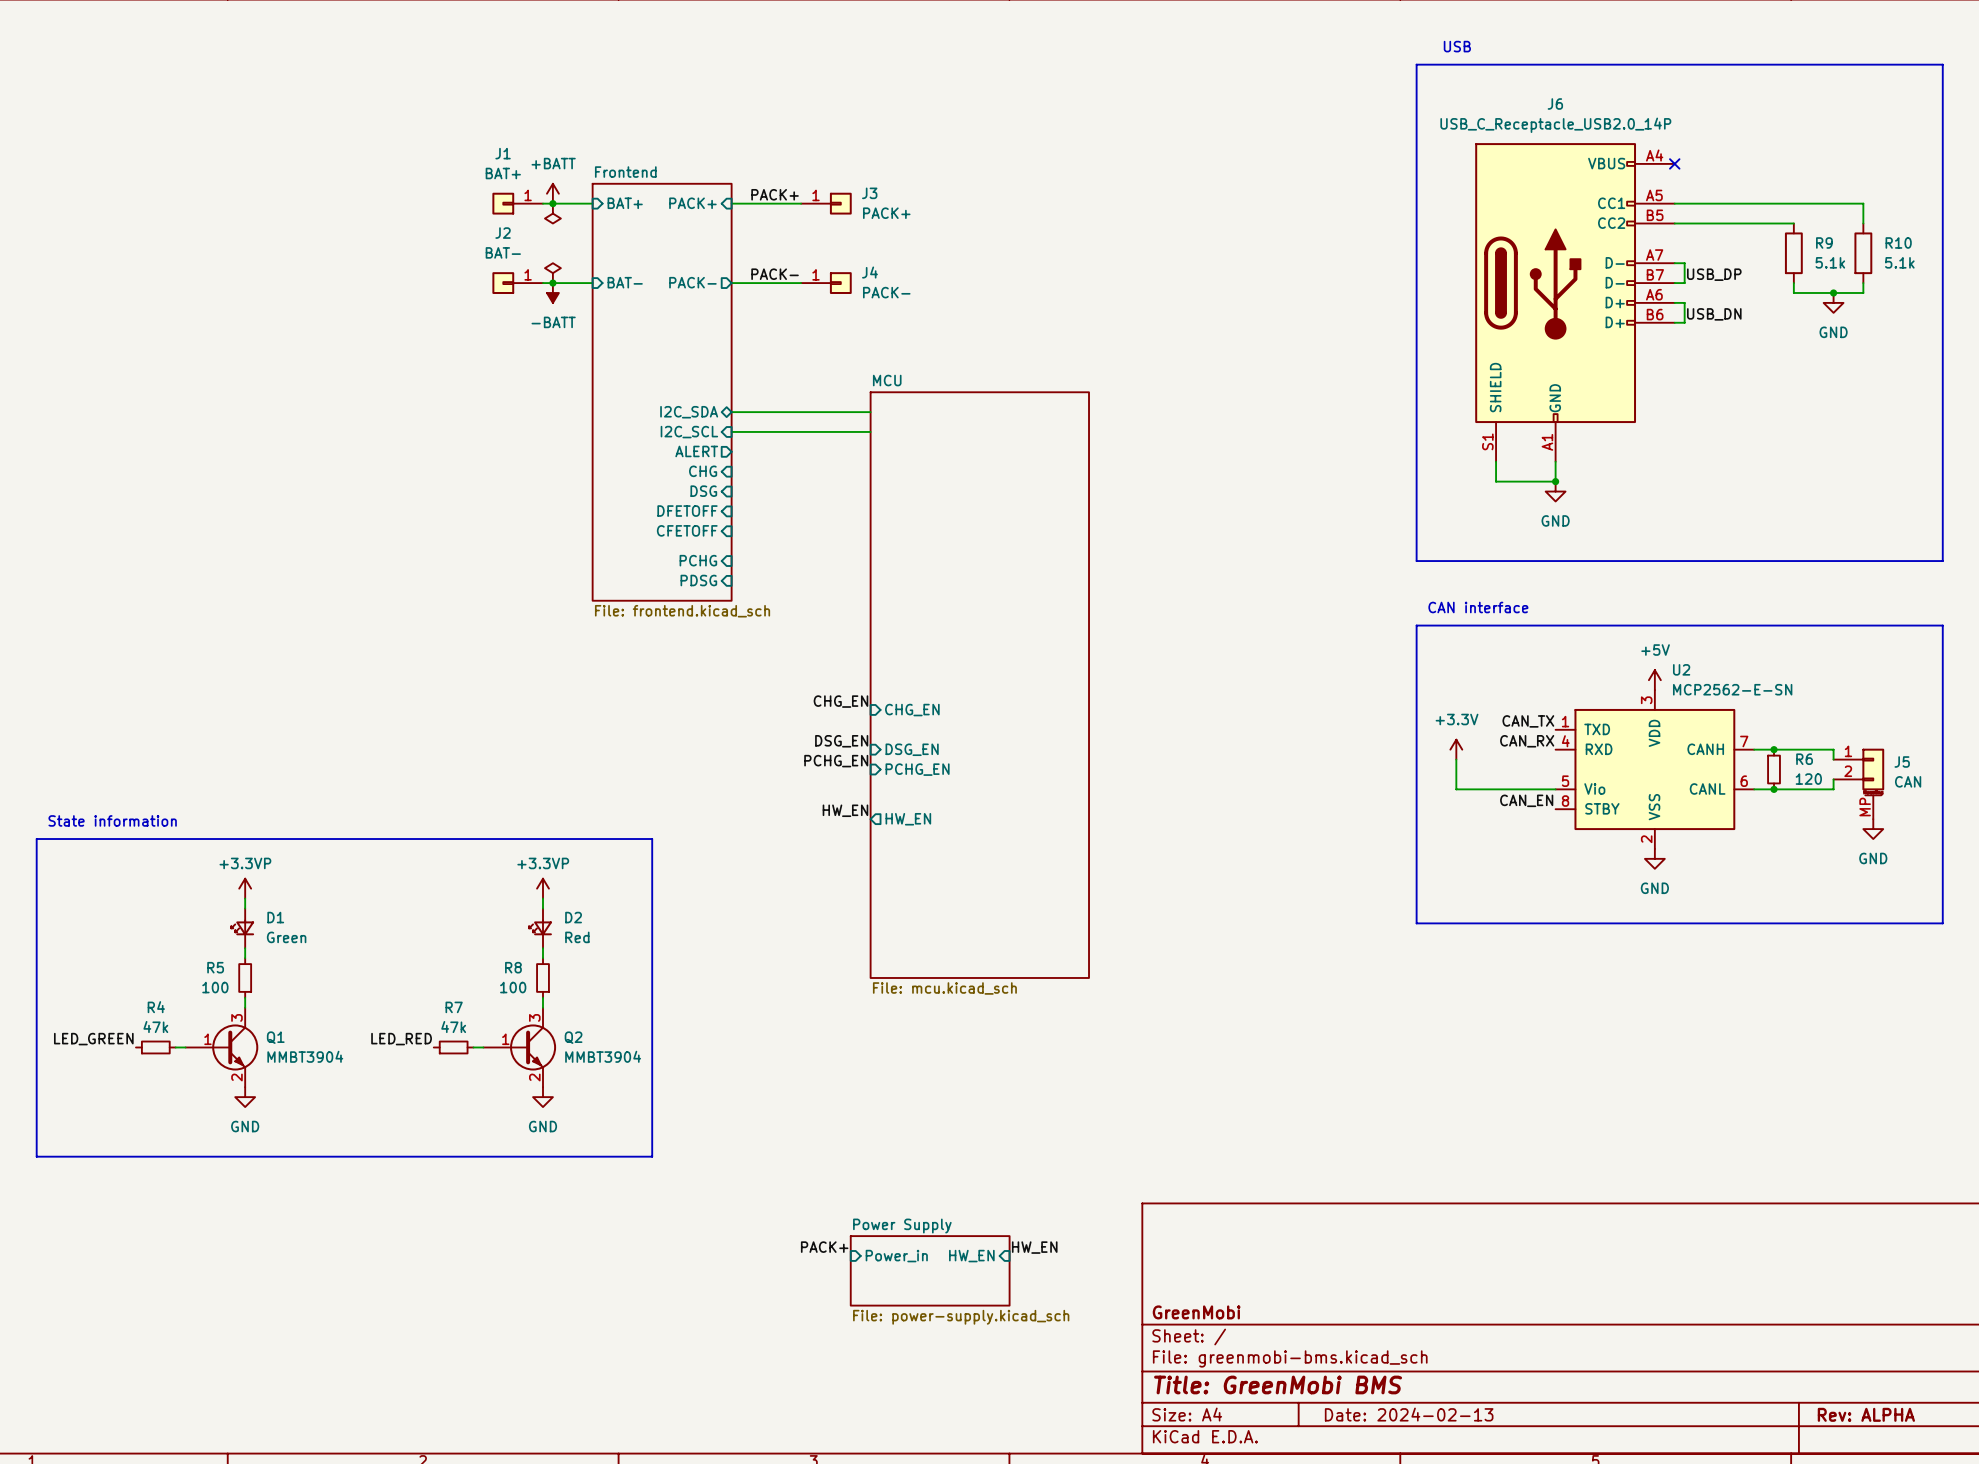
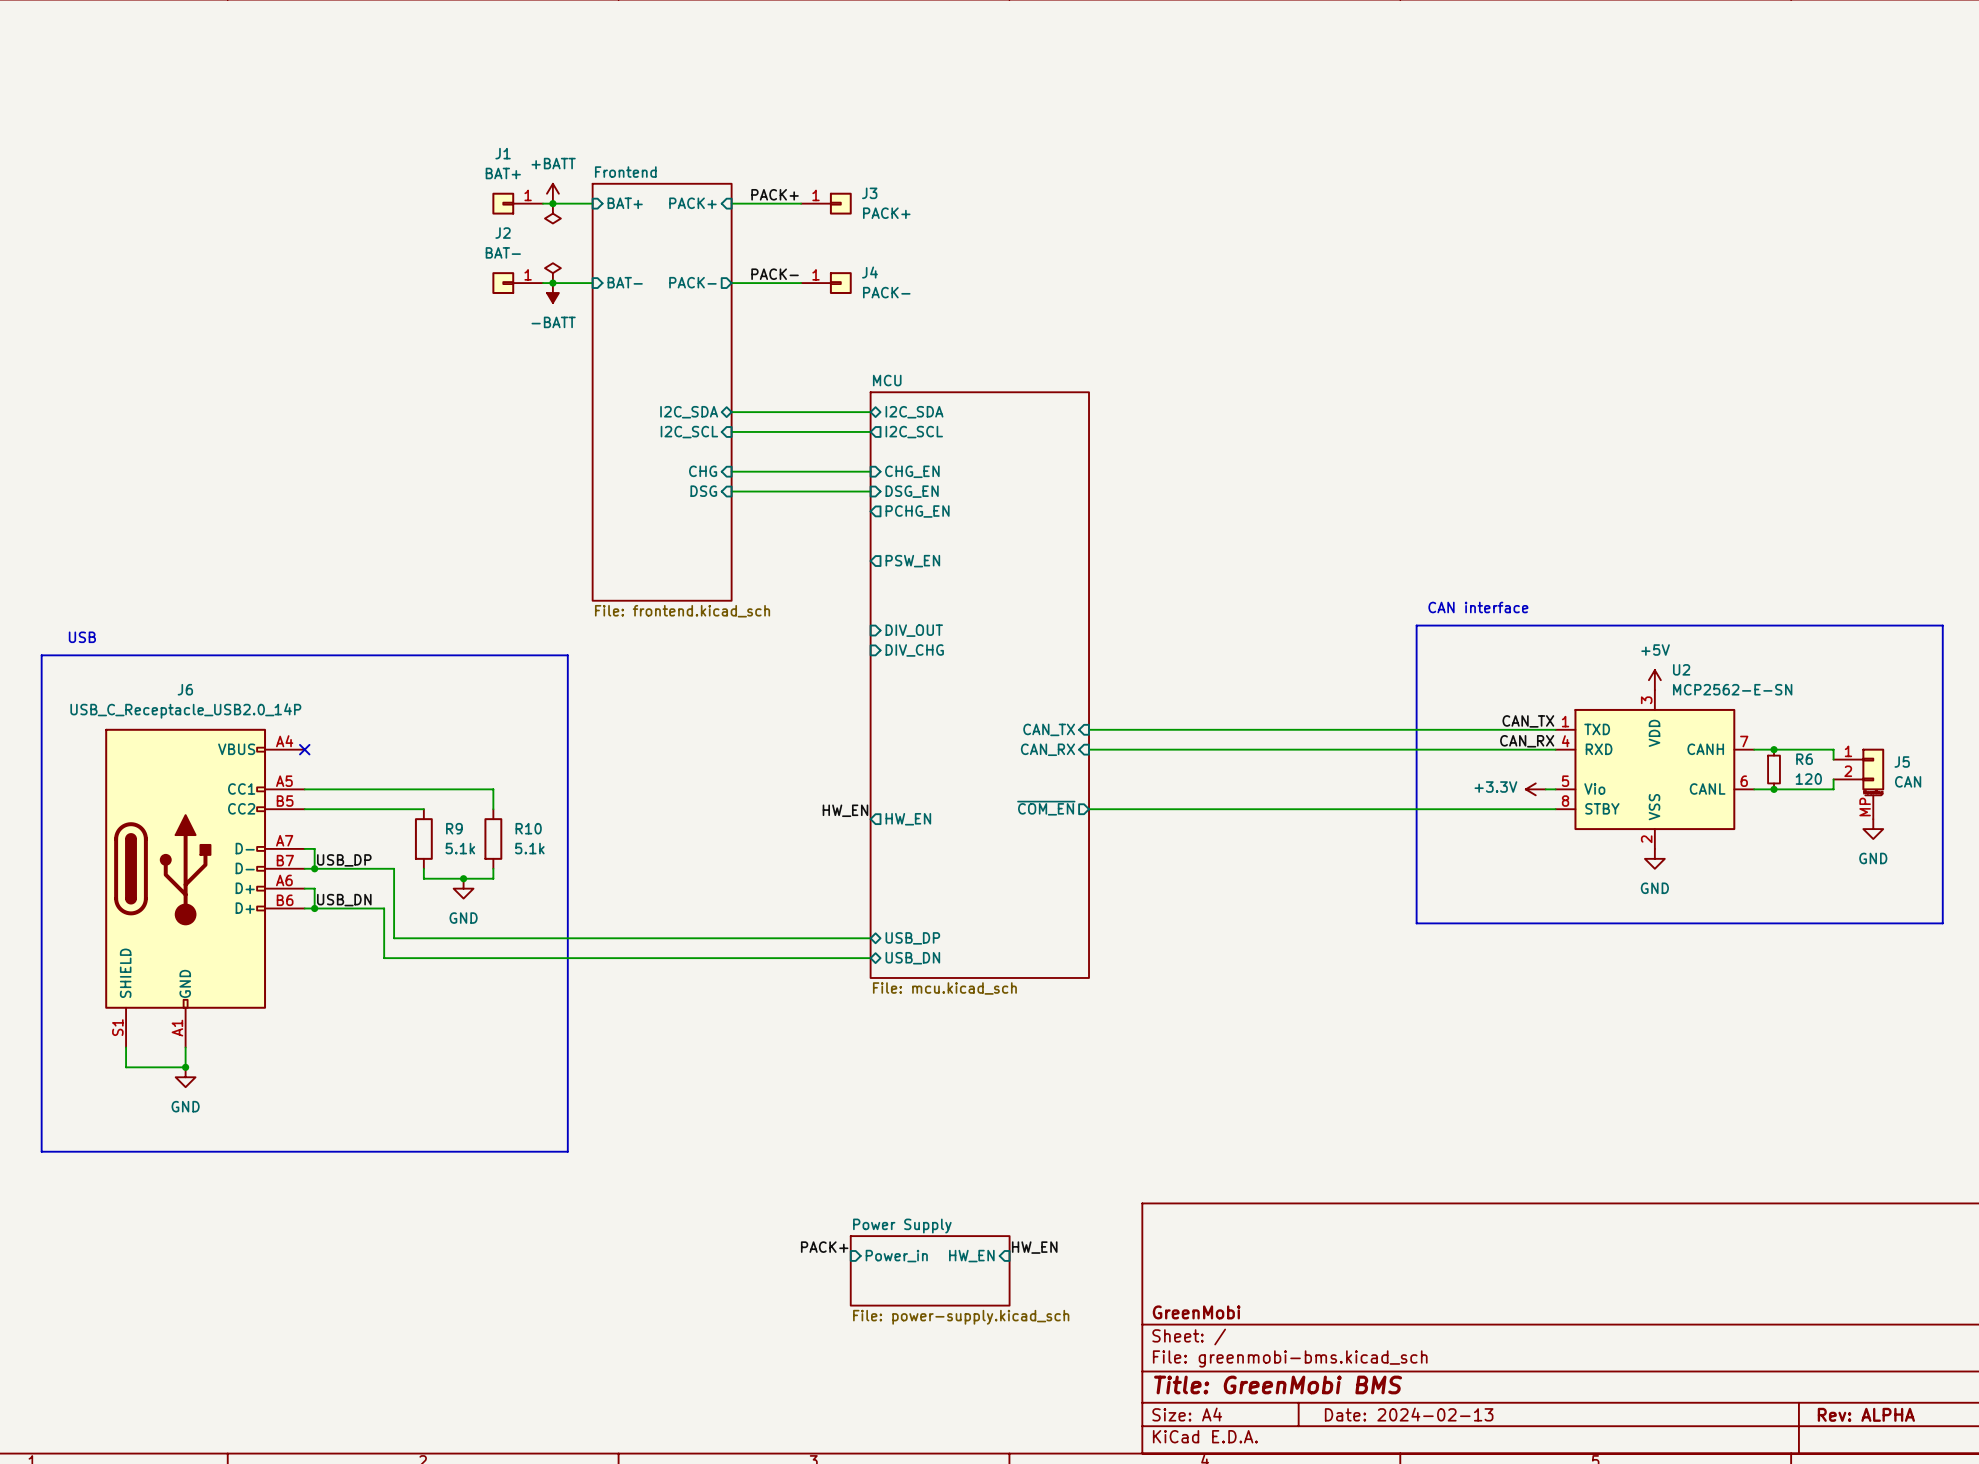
text: USB (1457, 46) -> none
line: (1416, 64) (1416, 561) (1942, 561) (1942, 64) (1416, 64) -> none
no-connect mark: (1674, 163) -> none
wire: (1674, 203) (1863, 203) (1863, 223) -> none
wire: (1674, 223) (1793, 223) -> none
R9 position: (1793, 253) -> (423, 839)
R10 position: (1863, 253) -> (493, 839)
wire: (1674, 263) (1684, 263) (1684, 283) (1674, 283) -> none
label: USB_DP (1714, 274) -> none
wire: (1793, 283) (1793, 292) (1863, 292) (1863, 283) -> none
junction: (1833, 292) -> none
J6 position: (1574, 302) -> (204, 888)
wire: (1674, 302) (1684, 302) (1684, 322) (1674, 322) -> none
power symbol: GND (1833, 302) -> none
label: USB_DN (1714, 314) -> none
sheet pin: none -> I2C_SDA (914, 412)
sheet pin: none -> I2C_SCL (914, 432)
sheet pin: ALERT (696, 451) -> none
wire: (1496, 461) (1496, 481) (1555, 481) (1555, 461) -> none
wire: none -> (731, 471) (870, 471)
sheet pin: none -> CHG_EN (912, 471)
junction: (1555, 481) -> none
wire: none -> (731, 491) (870, 491)
sheet pin: none -> DSG_EN (912, 491)
power symbol: GND (1555, 491) -> none
sheet pin: DFETOFF (687, 511) -> none
sheet pin: none -> PCHG_EN (917, 511)
sheet pin: CFETOFF (687, 530) -> none
sheet pin: PCHG (698, 560) -> none
sheet pin: none -> PSW_EN (912, 561)
sheet pin: PDSG (698, 580) -> none
sheet pin: none -> DIV_OUT (914, 630)
text: none -> USB (82, 637)
sheet pin: none -> DIV_CHG (914, 650)
label: CHG_EN (840, 701) -> none
sheet pin: CHG_EN (912, 710) -> none
sheet pin: none -> CAN_TX (1049, 729)
wire: none -> (1089, 729) (1555, 729)
label: DSG_EN (841, 741) -> none
no-connect mark: none -> (304, 749)
sheet pin: DSG_EN (912, 749) -> none
sheet pin: none -> CAN_RX (1047, 749)
wire: none -> (1089, 749) (1555, 749)
power symbol rotation: 0° (1456, 749) -> 90° counterclockwise (1535, 789)
power symbol position: +3.3V (1456, 749) -> +3.3V (1535, 789)
wire: (1456, 759) (1456, 789) (1545, 789) -> none
label: PCHG_EN (836, 761) -> none
sheet pin: PCHG_EN (917, 769) -> none
wire: none -> (304, 789) (493, 789) (493, 809)
label: CAN_EN (1526, 800) -> none
sheet pin: none -> ~{COM_EN} (1046, 808)
wire: none -> (304, 809) (423, 809)
wire: none -> (1089, 809) (1555, 809)
text: State information (112, 820) -> none
line: (36, 839) (36, 1156) (652, 1156) (652, 839) (36, 839) -> (41, 655) (41, 1151) (567, 1151) (567, 655) (41, 655)
wire: none -> (304, 848) (314, 848) (314, 868)
label: none -> USB_DP (344, 860)
wire: none -> (304, 868) (394, 868) (394, 938) (870, 938)
junction: none -> (314, 868)
wire: none -> (423, 868) (423, 878) (493, 878) (493, 868)
junction: none -> (463, 878)
power symbol: +3.3VP (245, 888) -> none
wire: none -> (304, 888) (314, 888) (314, 908)
power symbol: none -> GND (463, 888)
power symbol: +3.3VP (543, 888) -> none
wire: (543, 898) (543, 908) -> none
label: none -> USB_DN (344, 900)
wire: none -> (304, 908) (384, 908) (384, 958) (870, 958)
junction: none -> (314, 908)
D1: Green (242, 928) -> none
D2: Red (540, 928) -> none
sheet pin: none -> USB_DP (912, 938)
wire: (543, 948) (543, 958) -> none
sheet pin: none -> USB_DN (912, 958)
R5: 100 (245, 977) -> none
R8: 100 (543, 977) -> none
wire: (543, 997) (543, 1007) -> none
label: LED_GREEN (93, 1039) -> none
label: LED_RED (401, 1039) -> none
R4: 47k (155, 1047) -> none
wire: (175, 1047) (185, 1047) -> (126, 1047) (126, 1067) (185, 1067) (185, 1047)
Q1: MMBT3904 (221, 1047) -> none
R7: 47k (453, 1047) -> none
wire: (473, 1047) (483, 1047) -> none
Q2: MMBT3904 (519, 1047) -> none
junction: none -> (185, 1067)
power symbol position: GND (245, 1097) -> GND (185, 1077)
power symbol: GND (543, 1097) -> none

